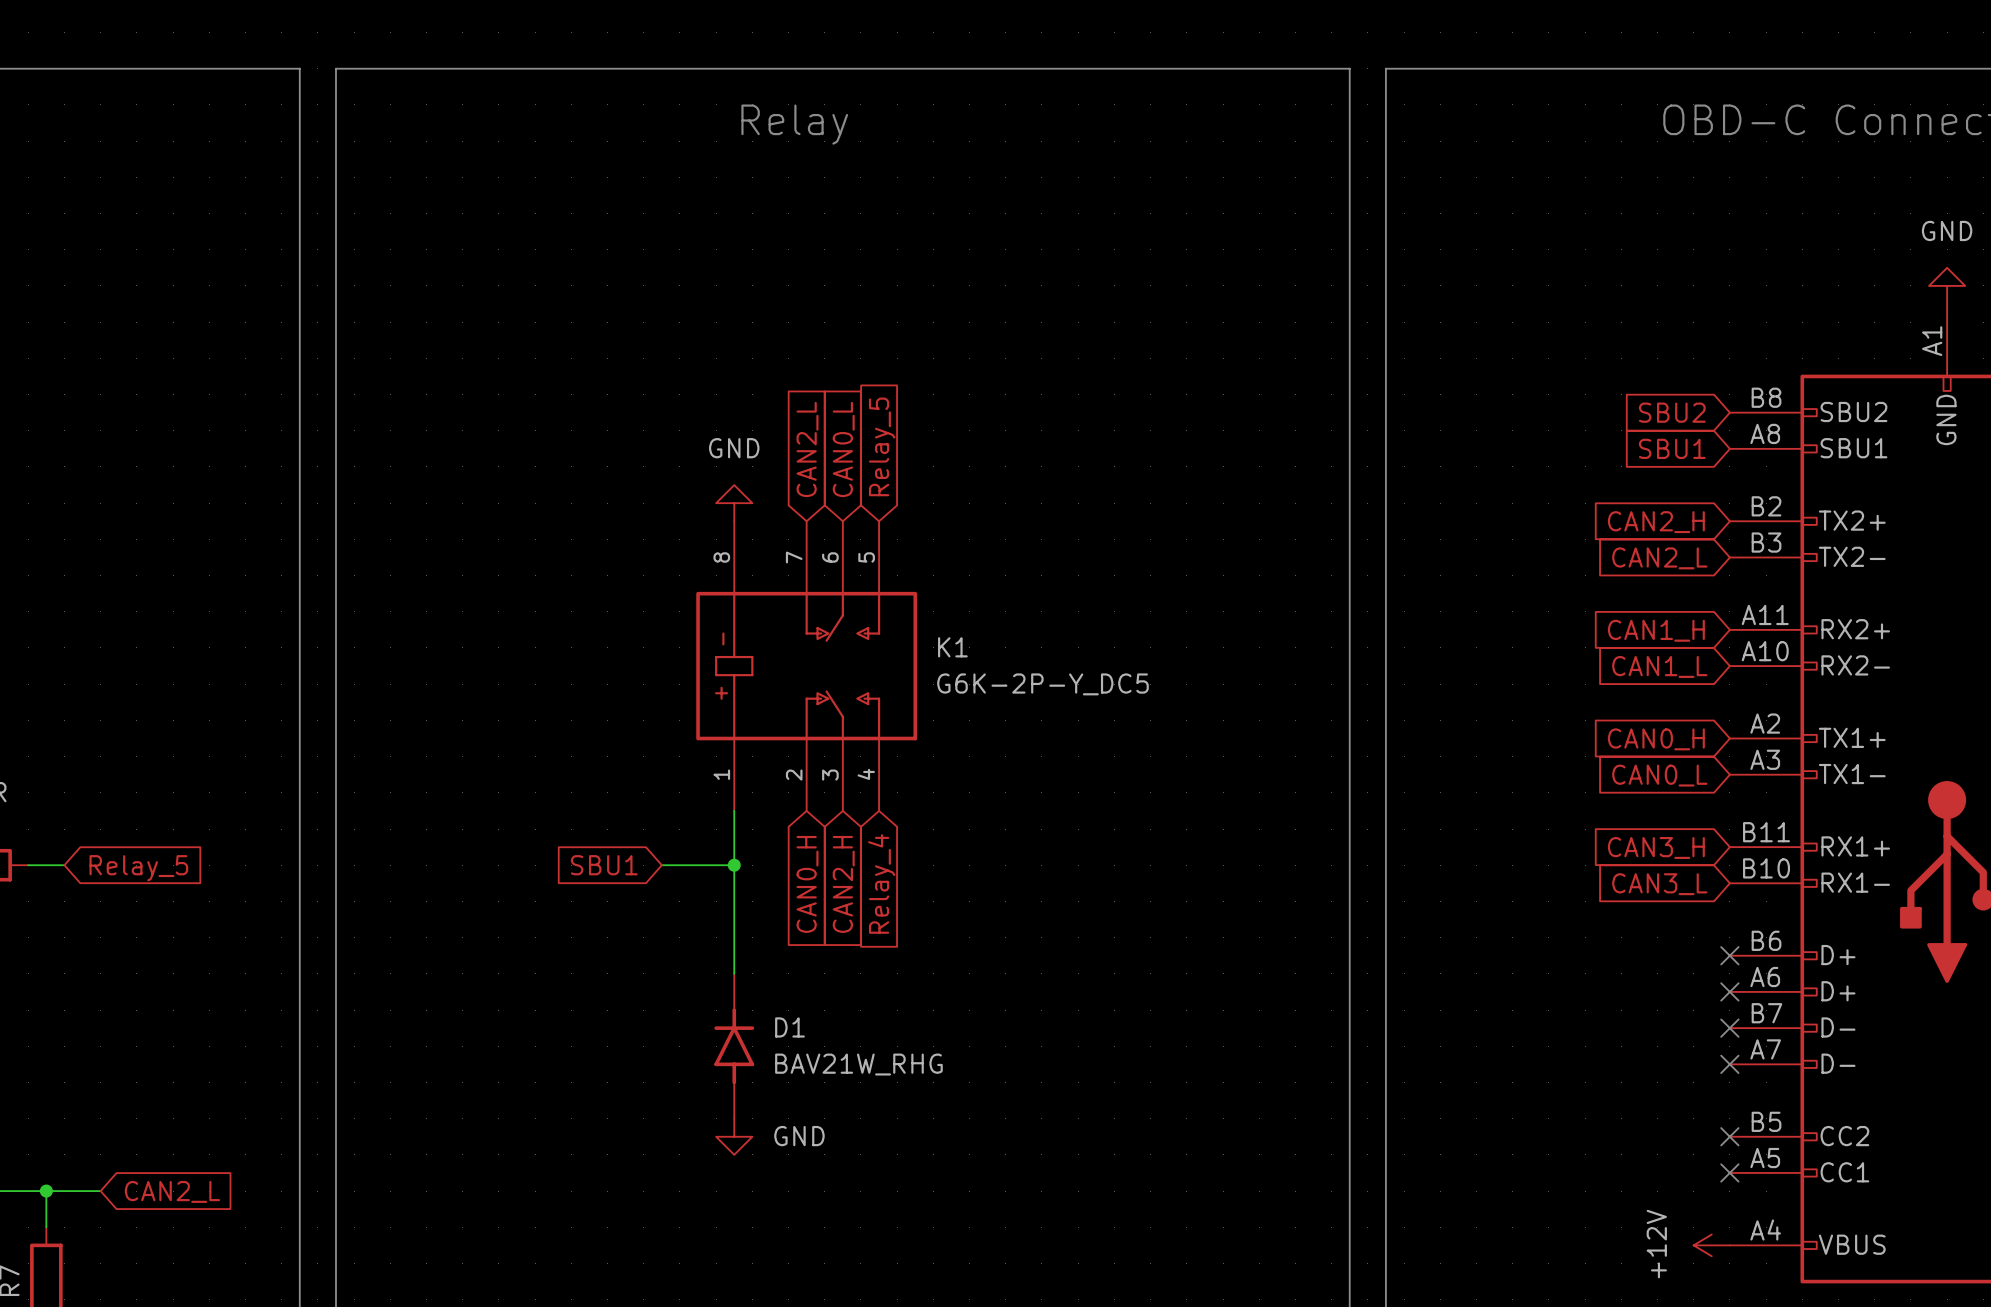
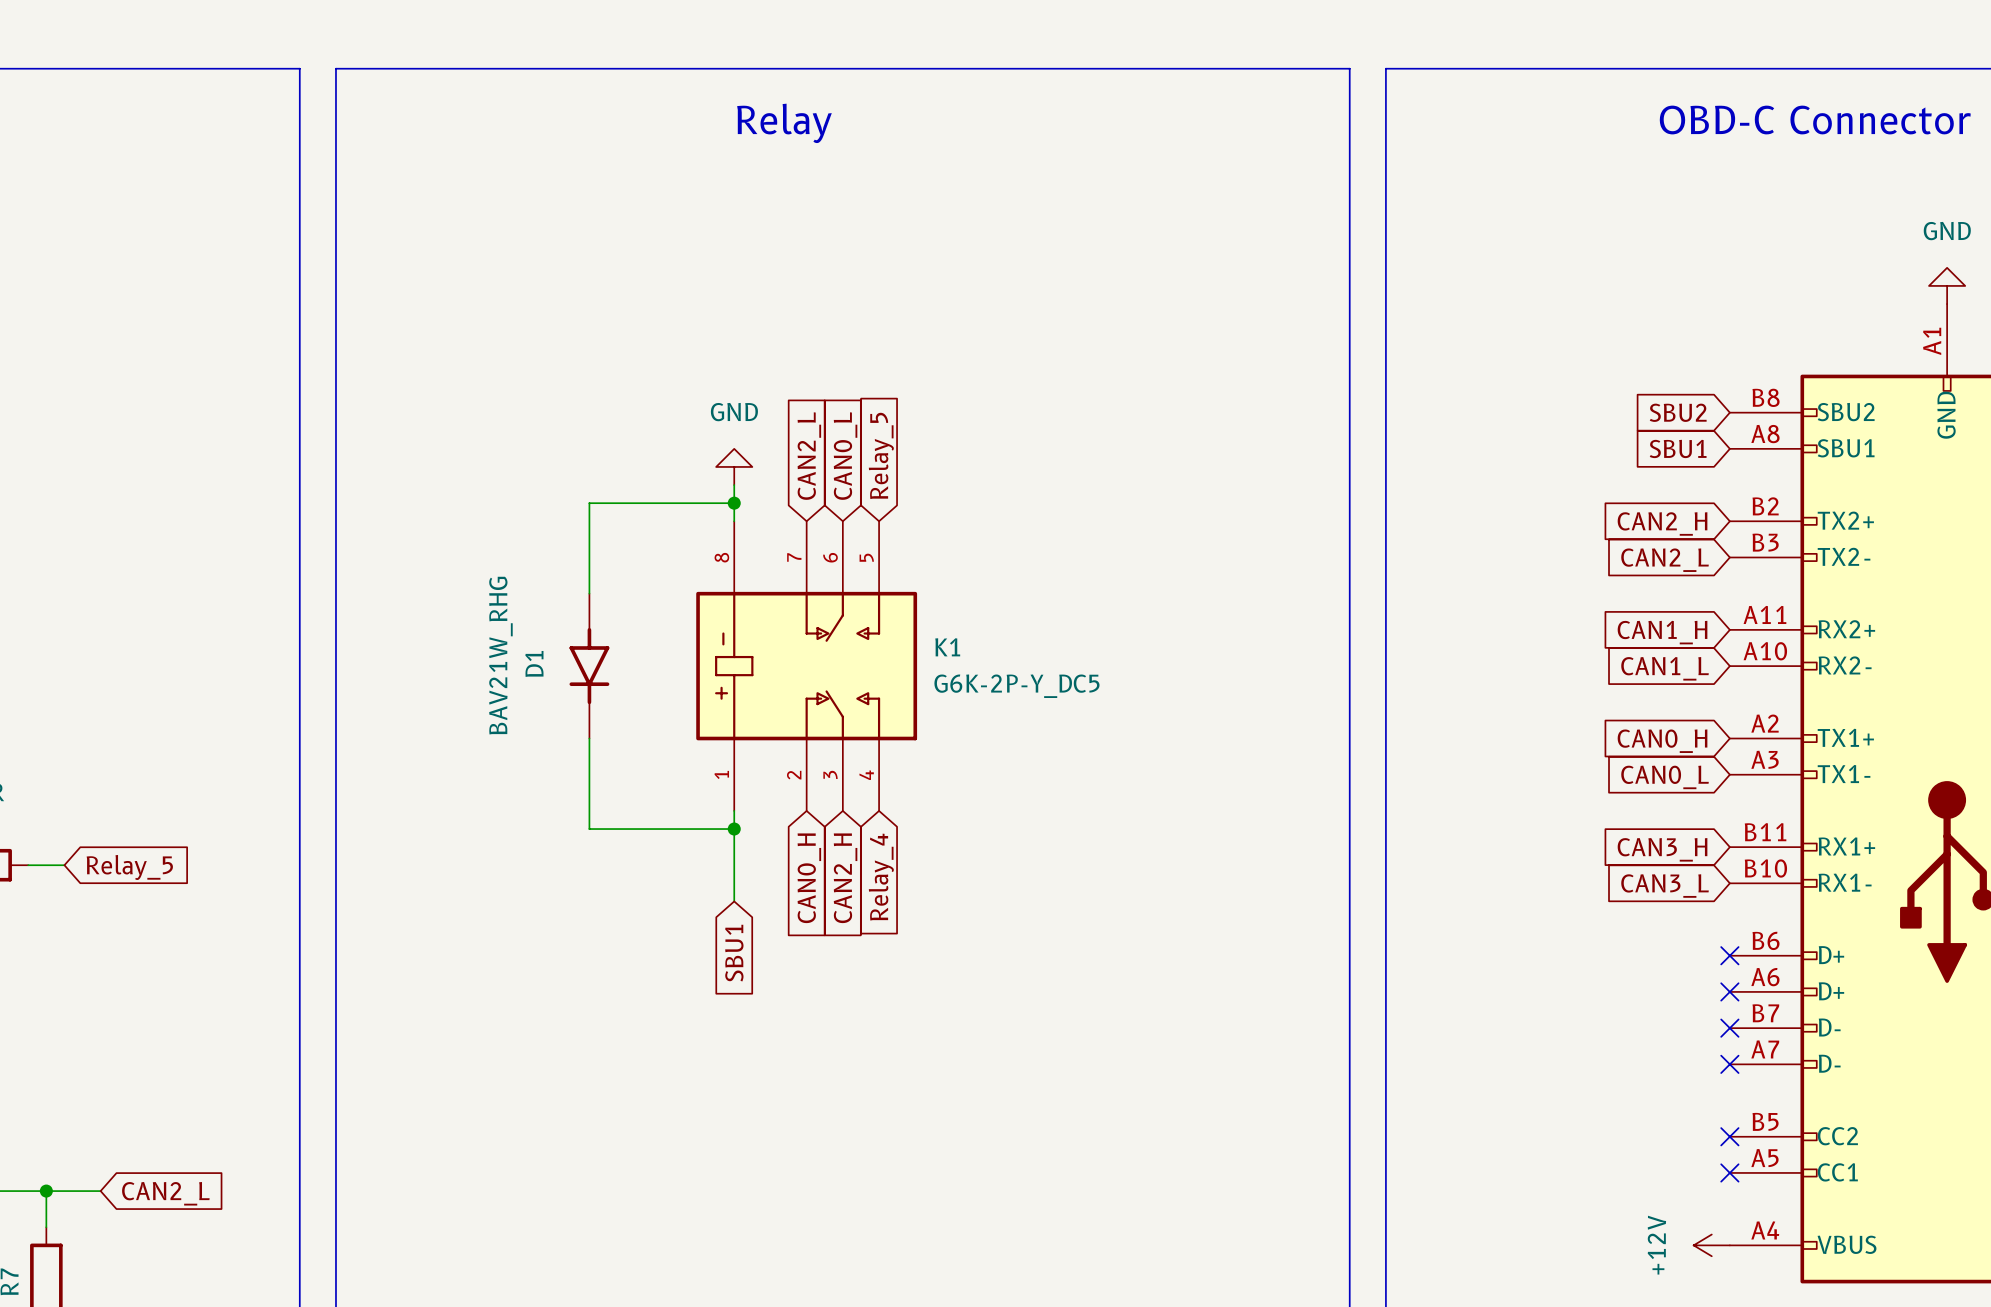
wire: none -> (734, 503) (589, 503) (589, 593)
junction: none -> (734, 503)
power symbol position: GND (734, 503) -> GND (734, 466)
wire: none -> (589, 738) (589, 829) (734, 829)
global label rotation: 0° (604, 865) -> 90° counterclockwise (734, 953)
global label position: SBU1 (604, 865) -> SBU1 (734, 953)
wire: (661, 865) (734, 865) -> none
junction position: (734, 865) -> (734, 829)
wire: (734, 901) (734, 973) -> none
D1 name rotation: 0° (789, 1027) -> 90° counterclockwise (534, 663)
D1 name position: D1 (789, 1027) -> D1 (534, 663)
D1 position: (734, 1046) -> (589, 666)
D1 value rotation: 0° (858, 1064) -> 90° counterclockwise (500, 655)
D1 value position: BAV21W_RHG (858, 1064) -> BAV21W_RHG (500, 655)
power symbol: GND (734, 1136) -> none

